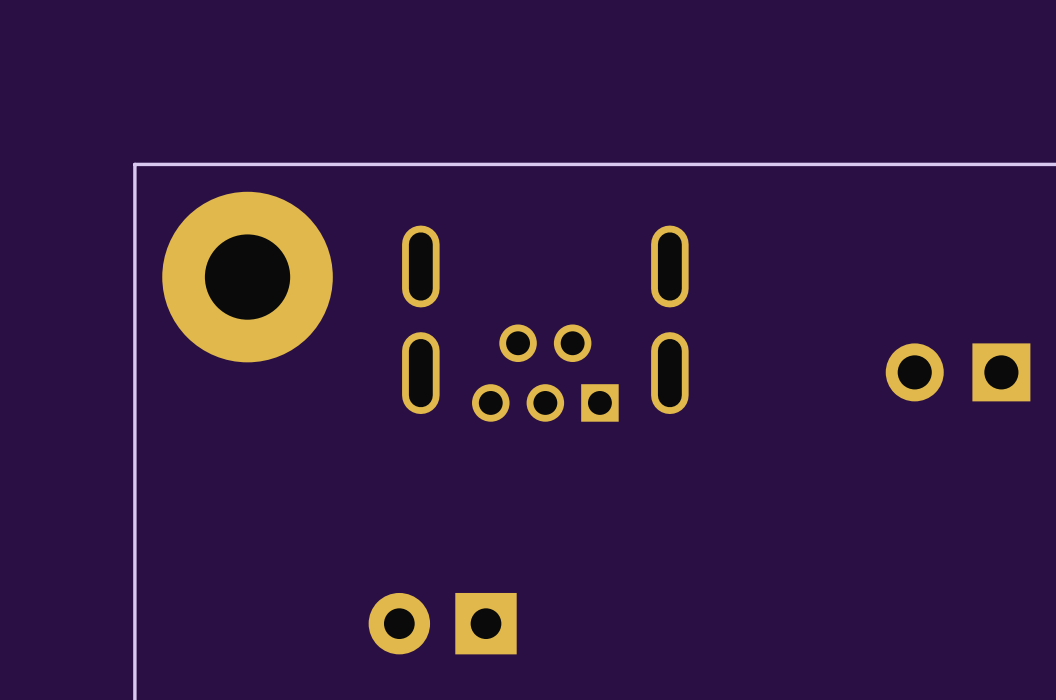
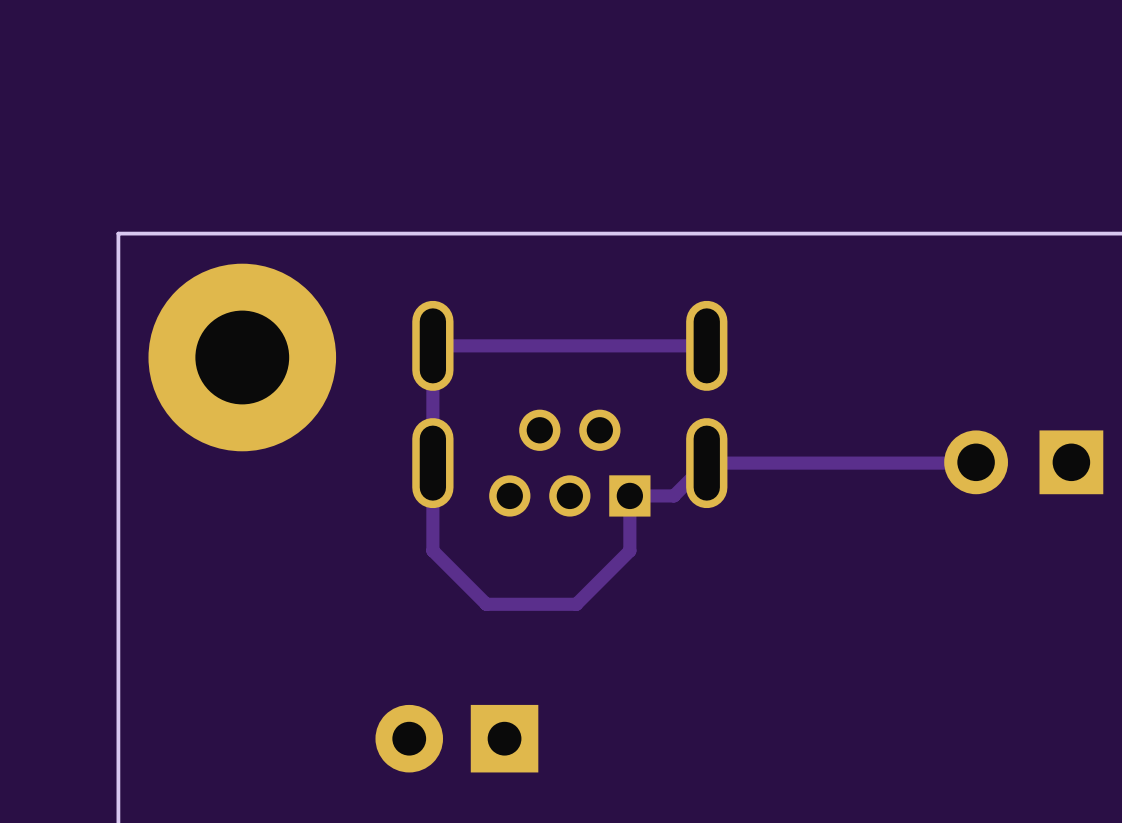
track: none -> (706, 345) (432, 345) (432, 550) (486, 604) (576, 604) (629, 550) (629, 495) (673, 495) (706, 463) (976, 462)

